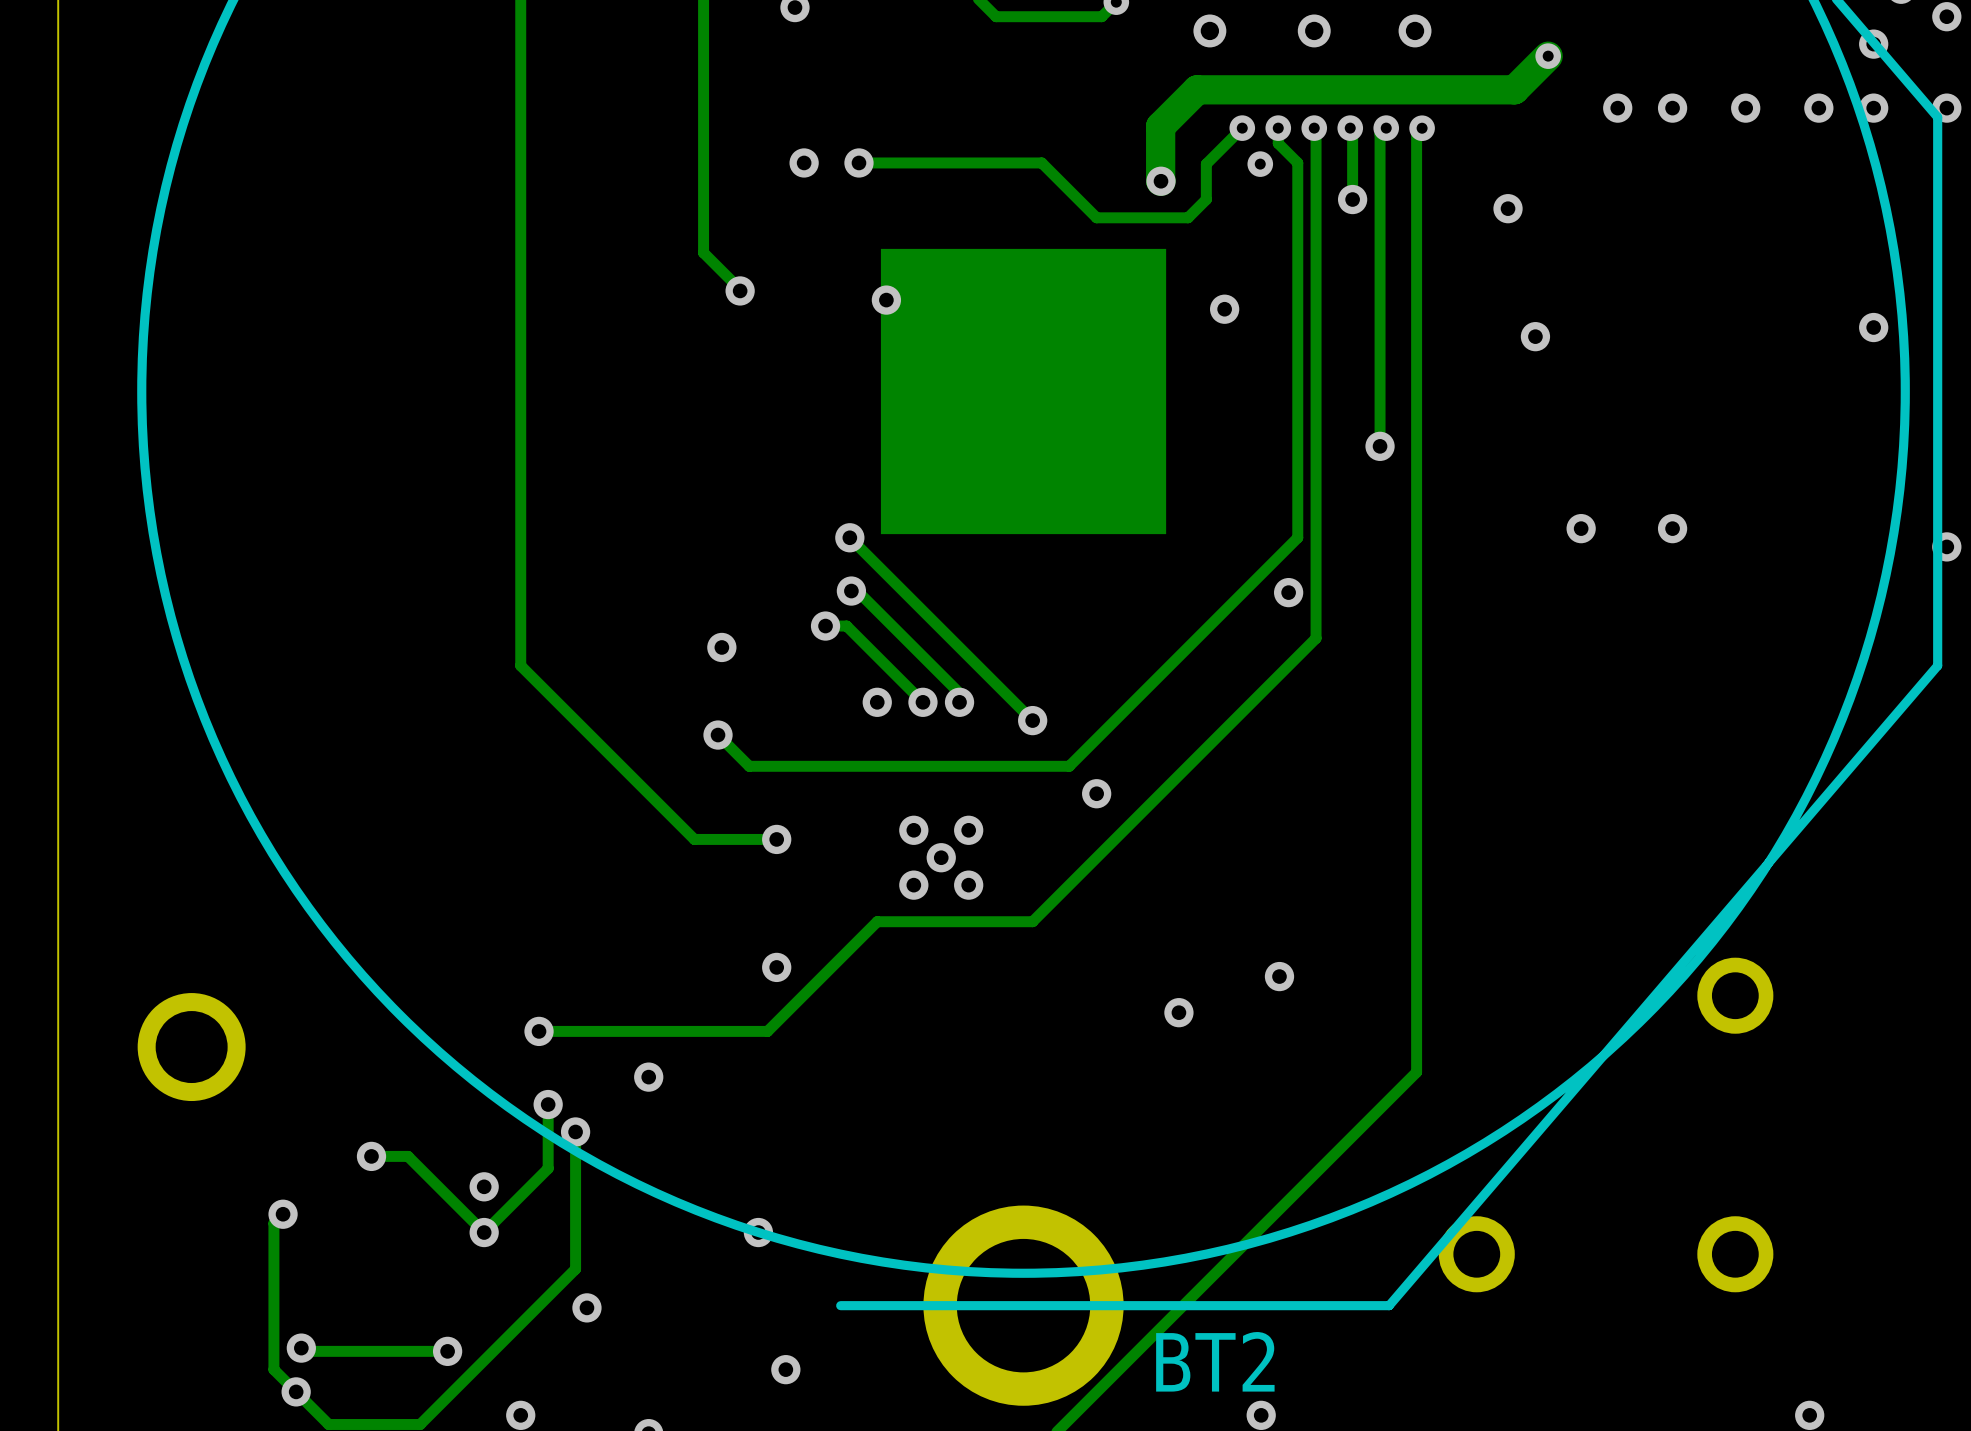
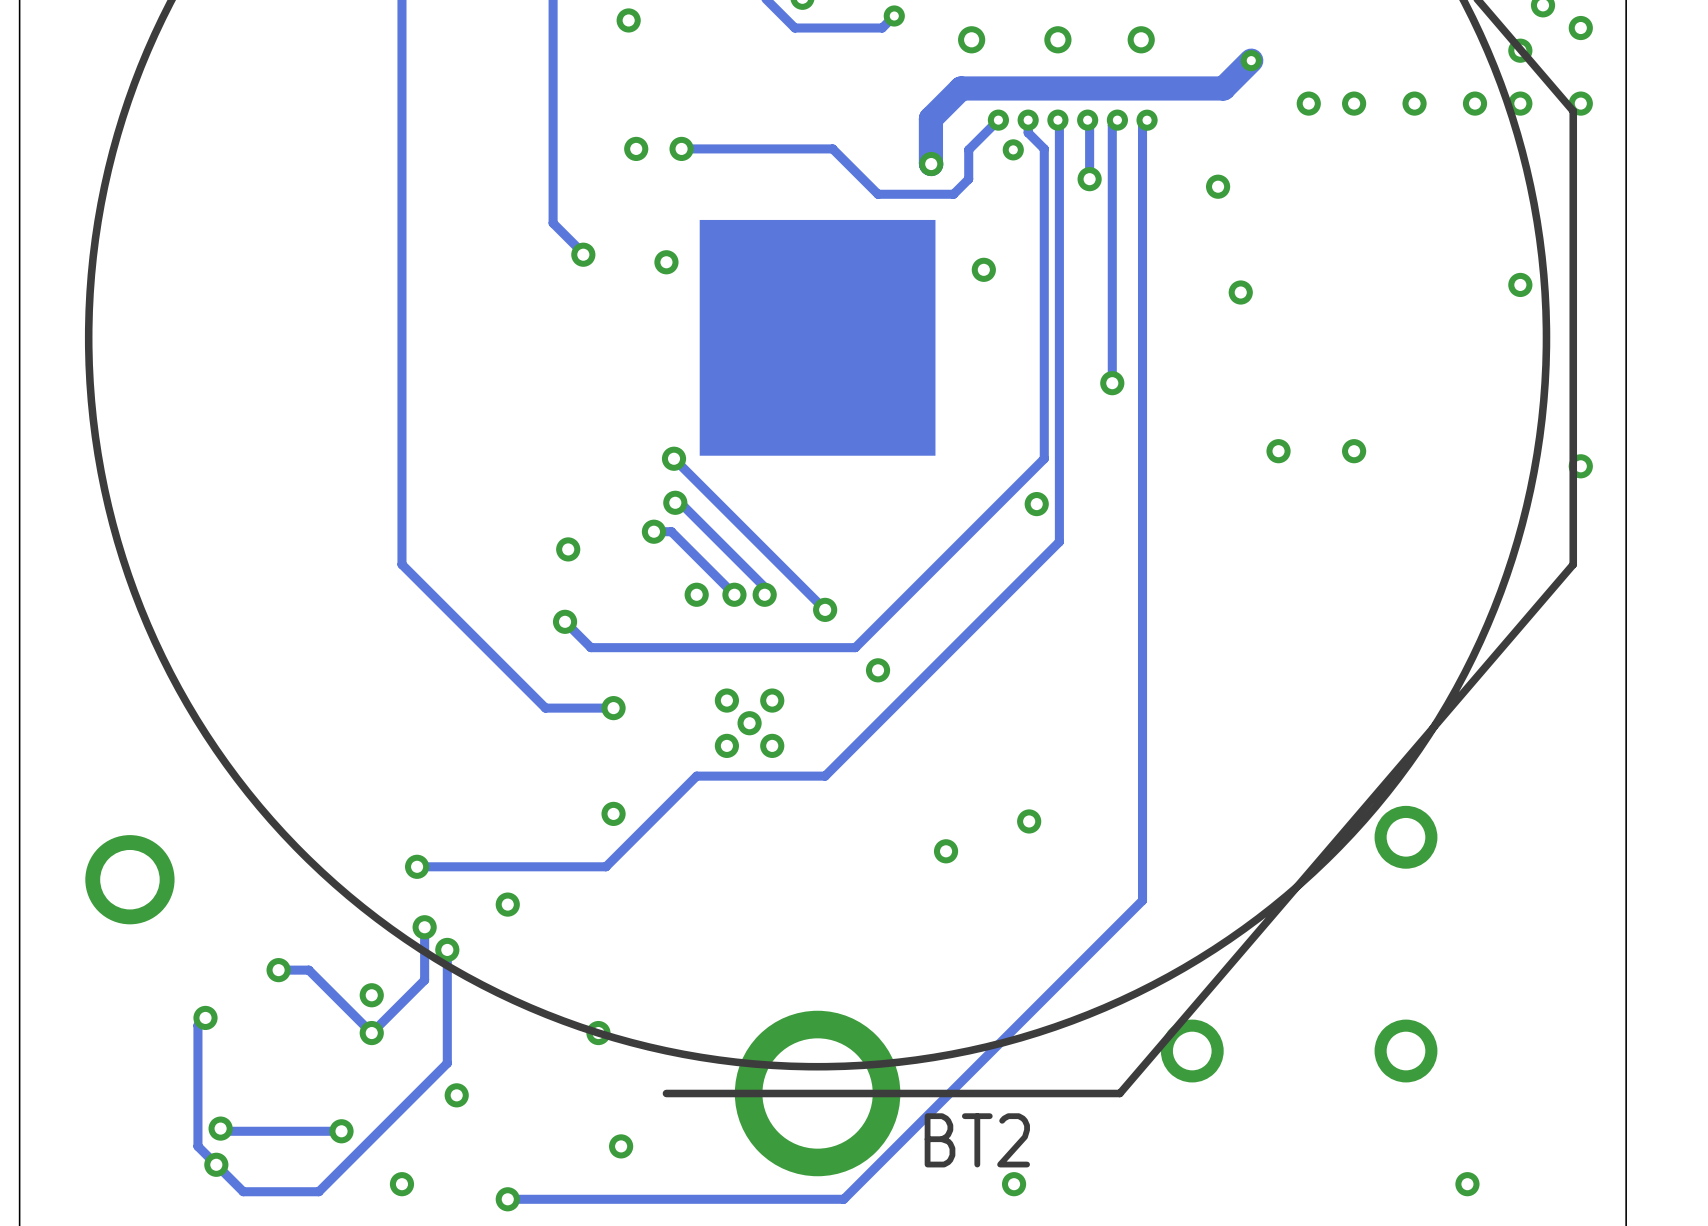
via position: (886, 300) -> (666, 262)

